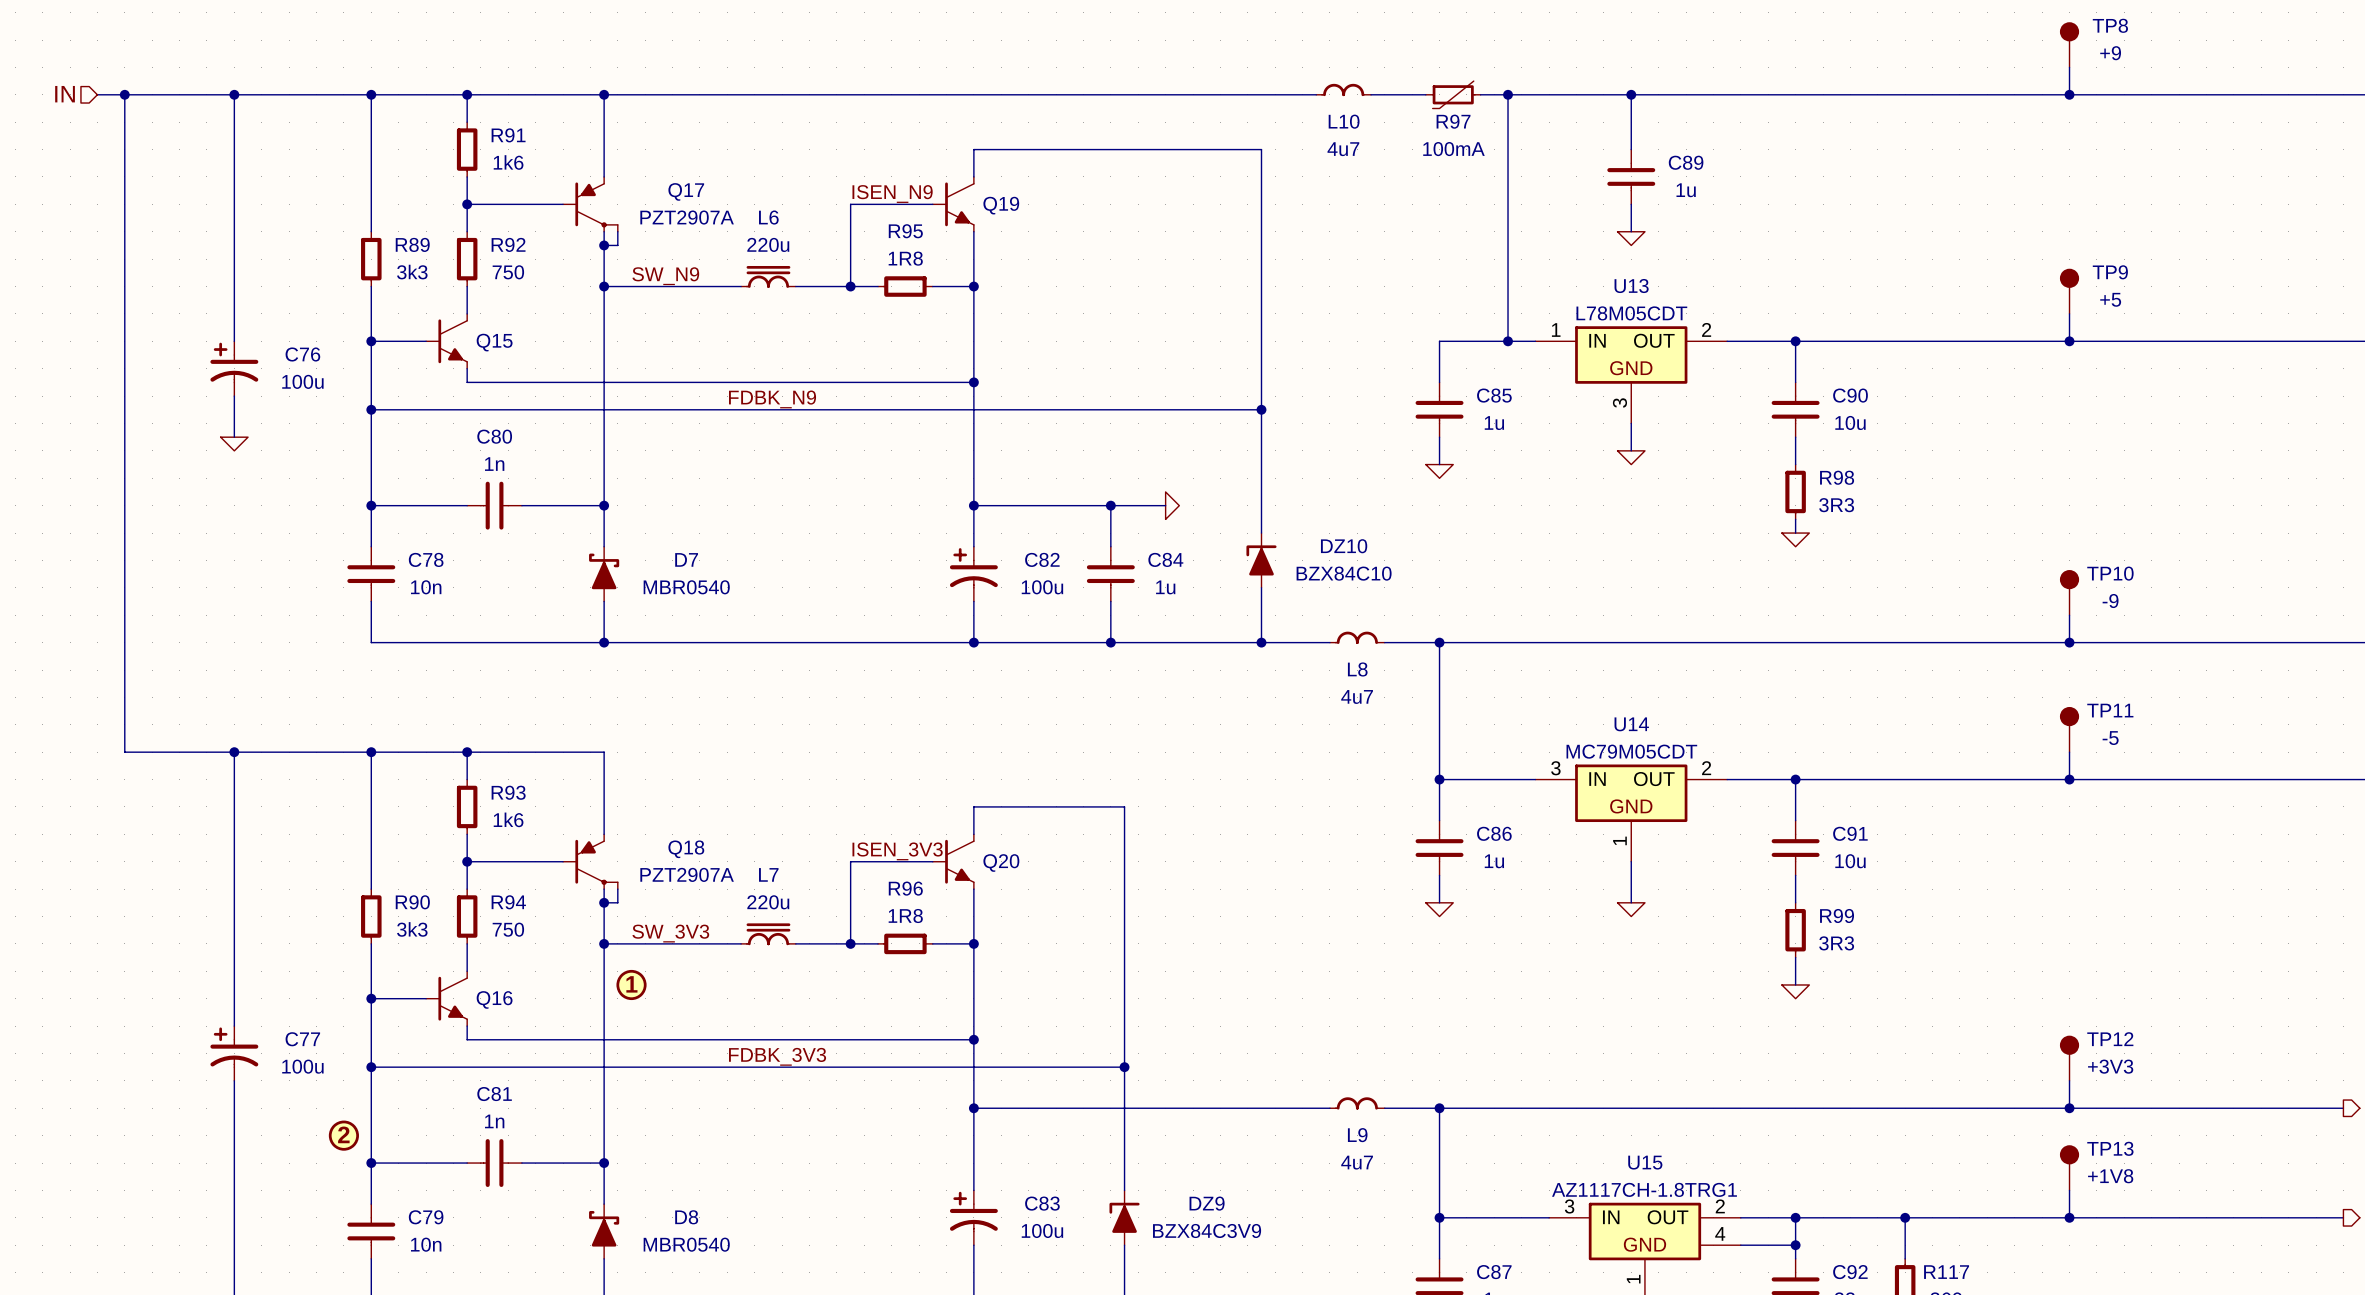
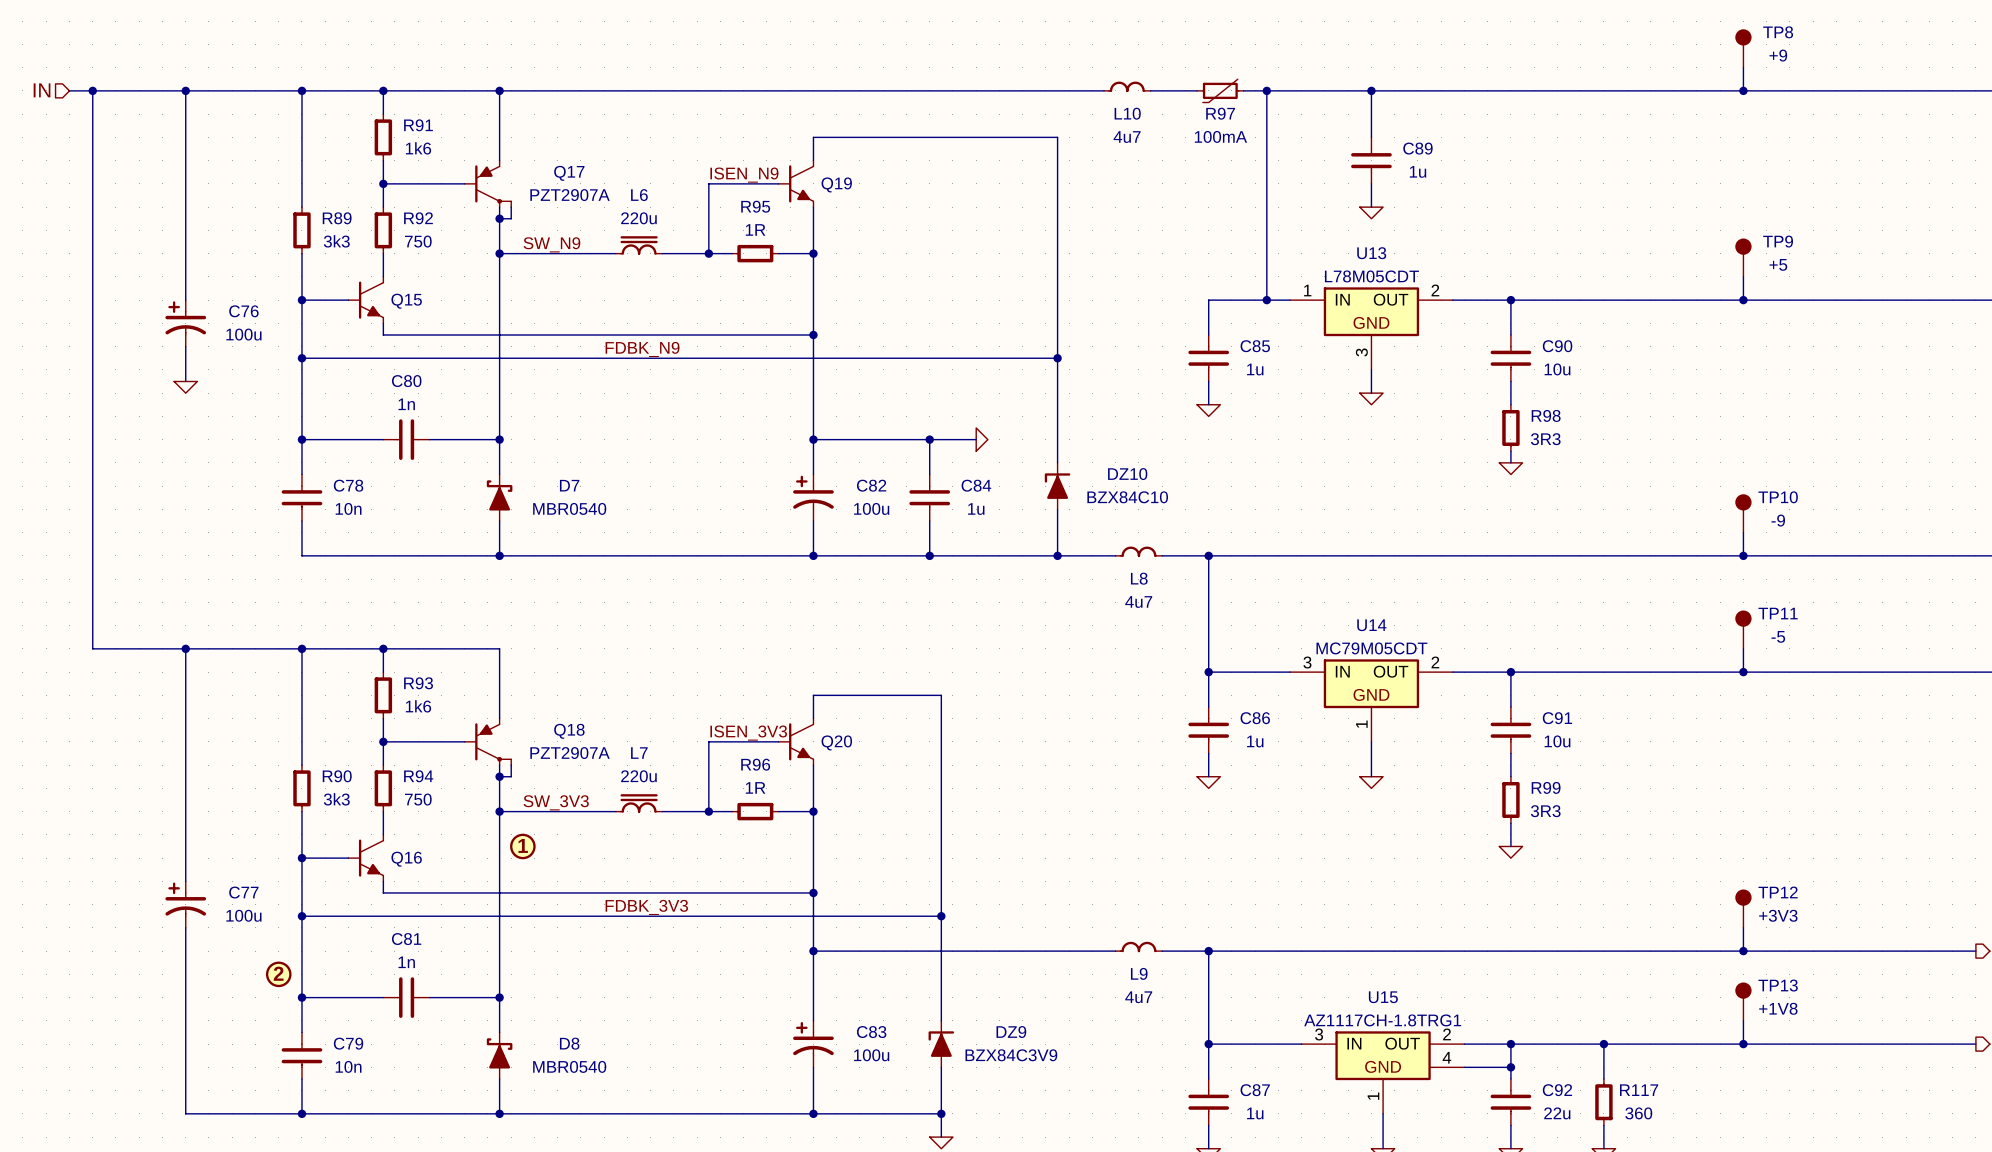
R95 value: 1R8 (905, 258) -> 1R (755, 229)
R96 value: 1R8 (905, 916) -> 1R (755, 787)

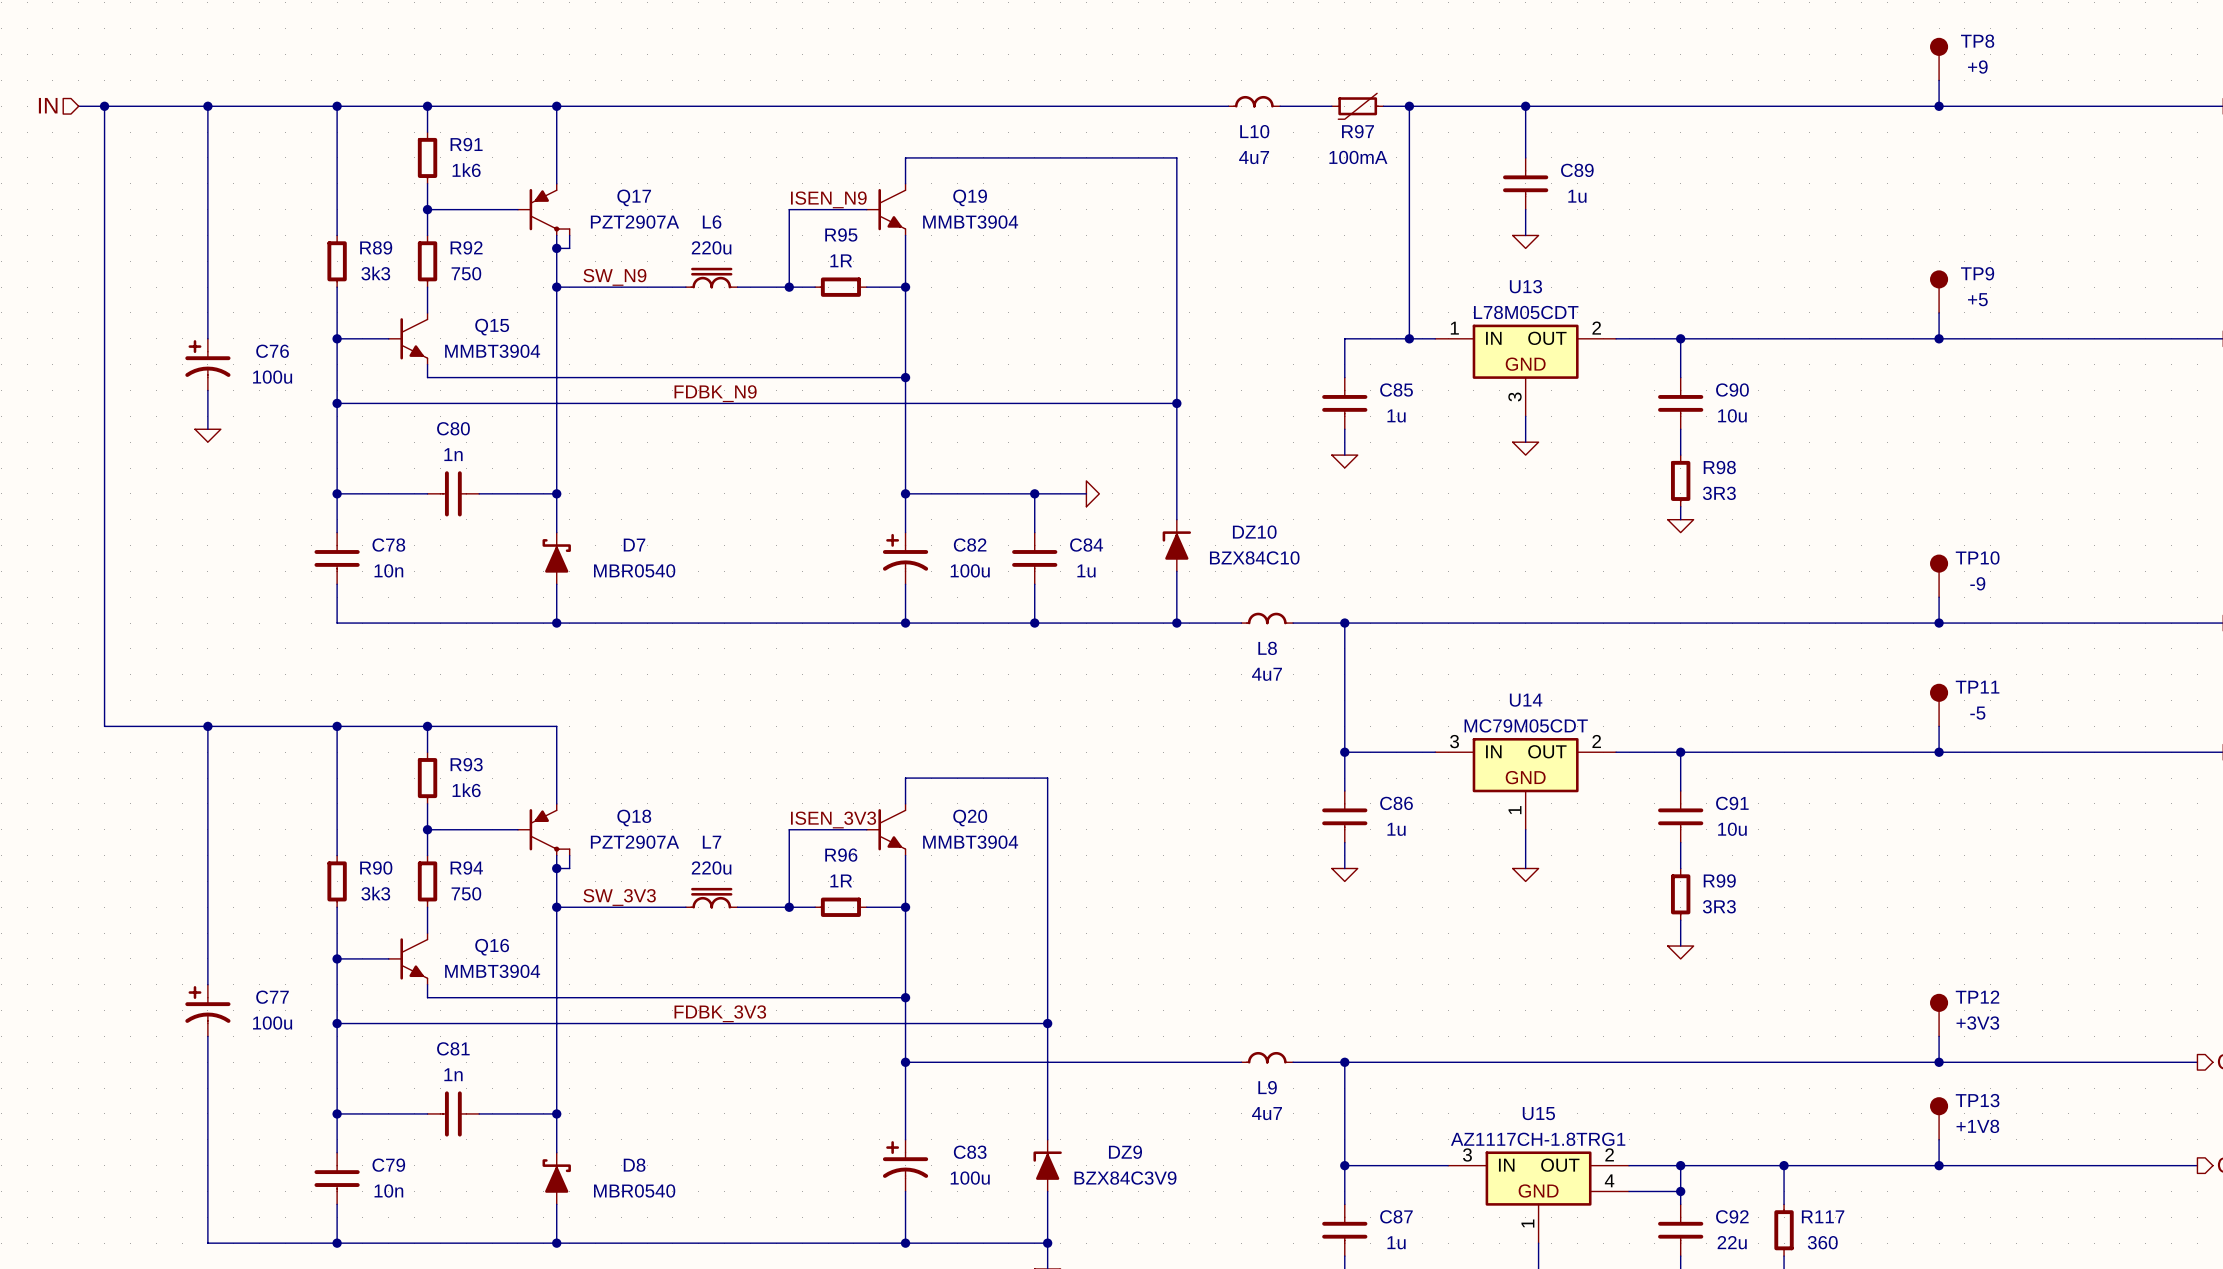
Q19 name position: Q19 (836, 184) -> Q19 (970, 197)
Q19 value: none -> MMBT3904 (970, 222)
Q15 name position: Q15 (406, 301) -> Q15 (492, 327)
Q15 value: none -> MMBT3904 (492, 351)
Q20 name position: Q20 (836, 742) -> Q20 (970, 818)
Q20 value: none -> MMBT3904 (970, 842)
power symbol: (522, 846) -> none
Q16 name position: Q16 (406, 859) -> Q16 (492, 947)
Q16 value: none -> MMBT3904 (492, 971)
power symbol: (278, 974) -> none

